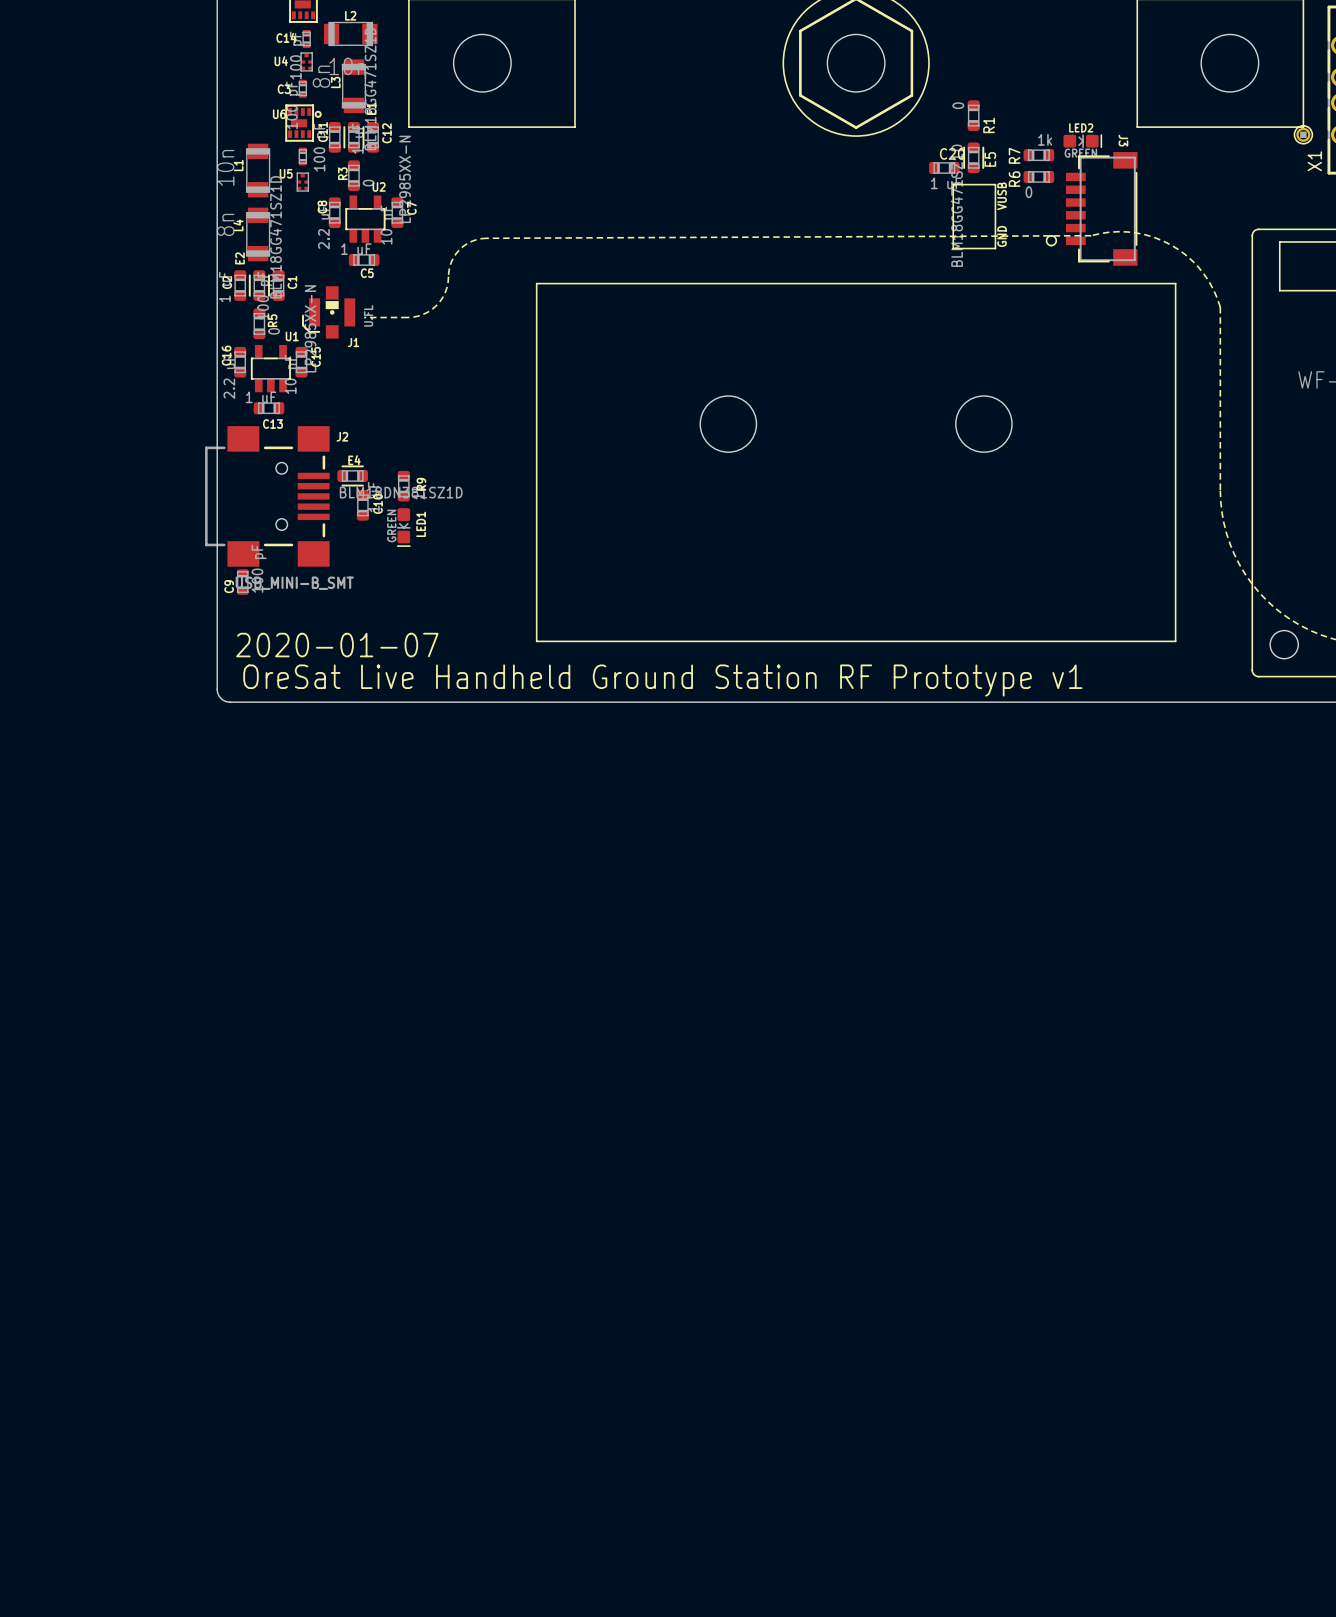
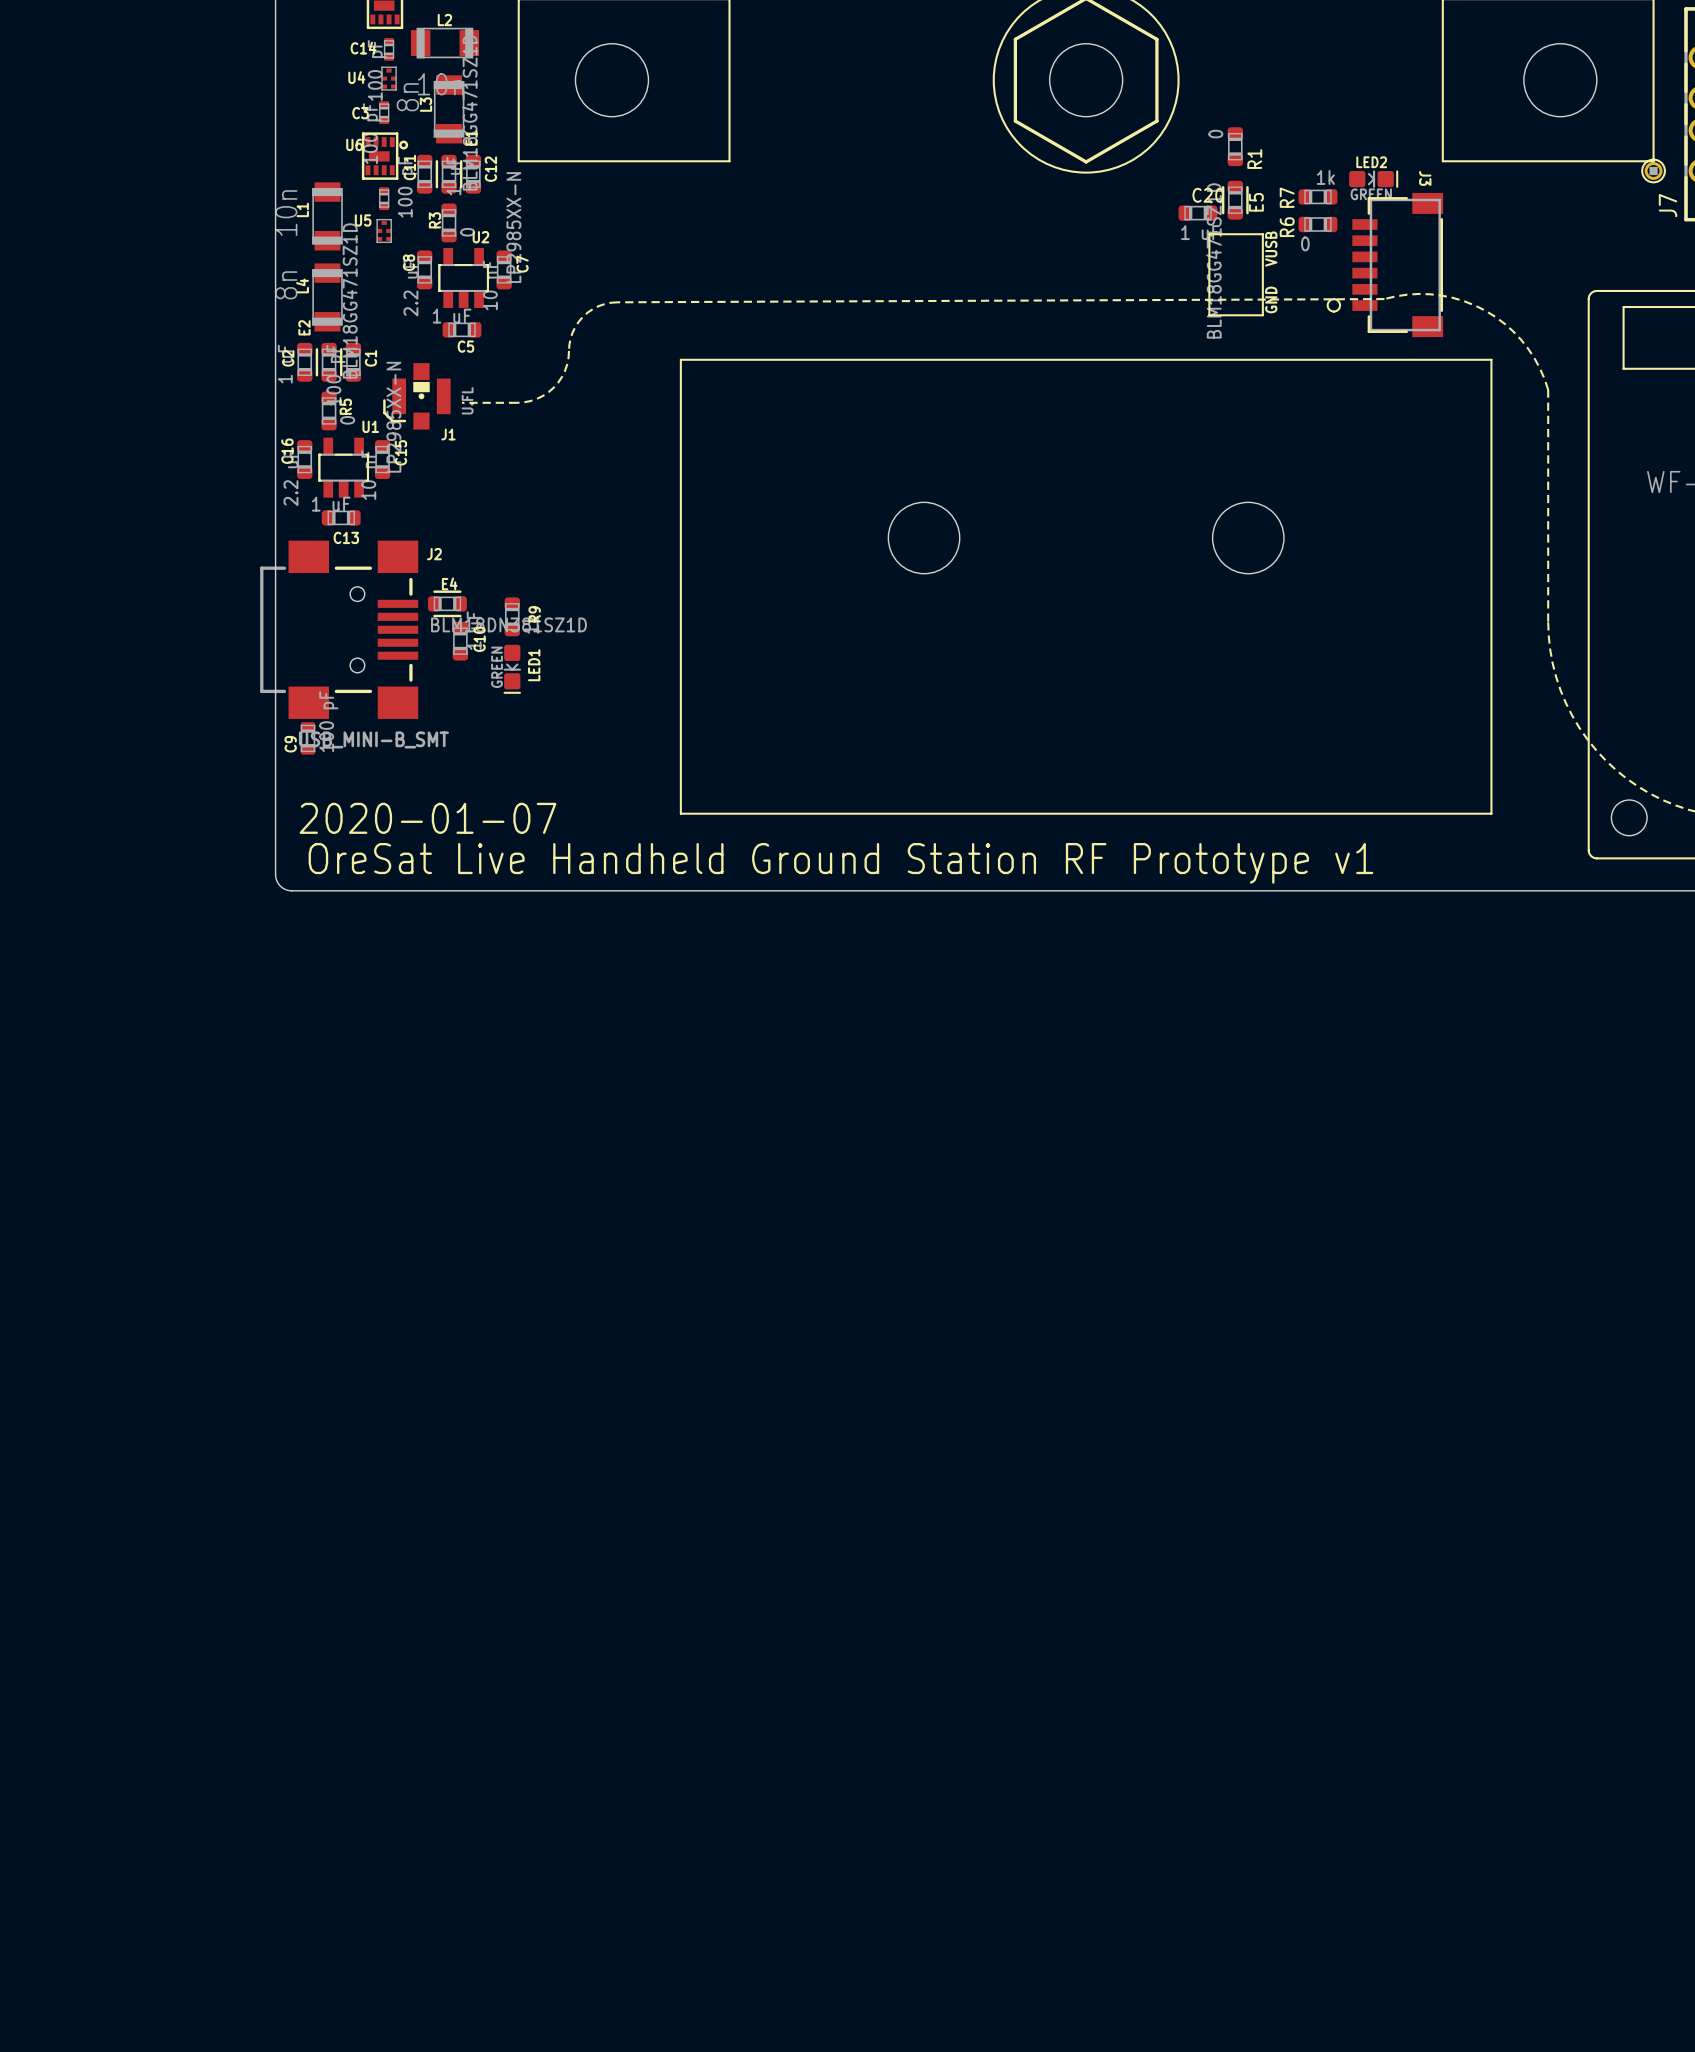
X1 name: X1 (1314, 161) -> J7 (1668, 205)

